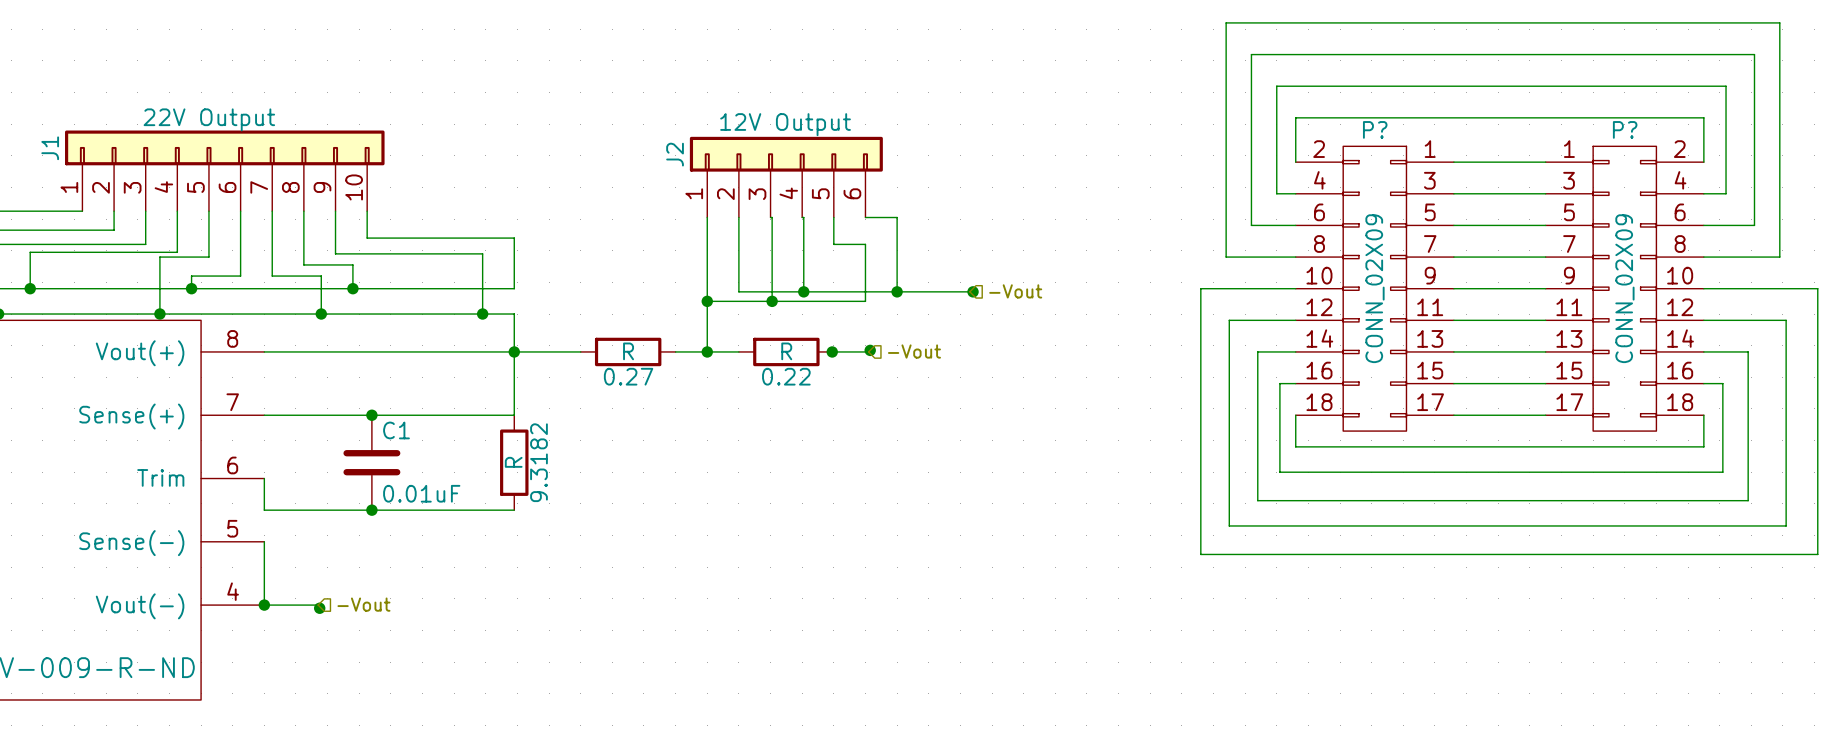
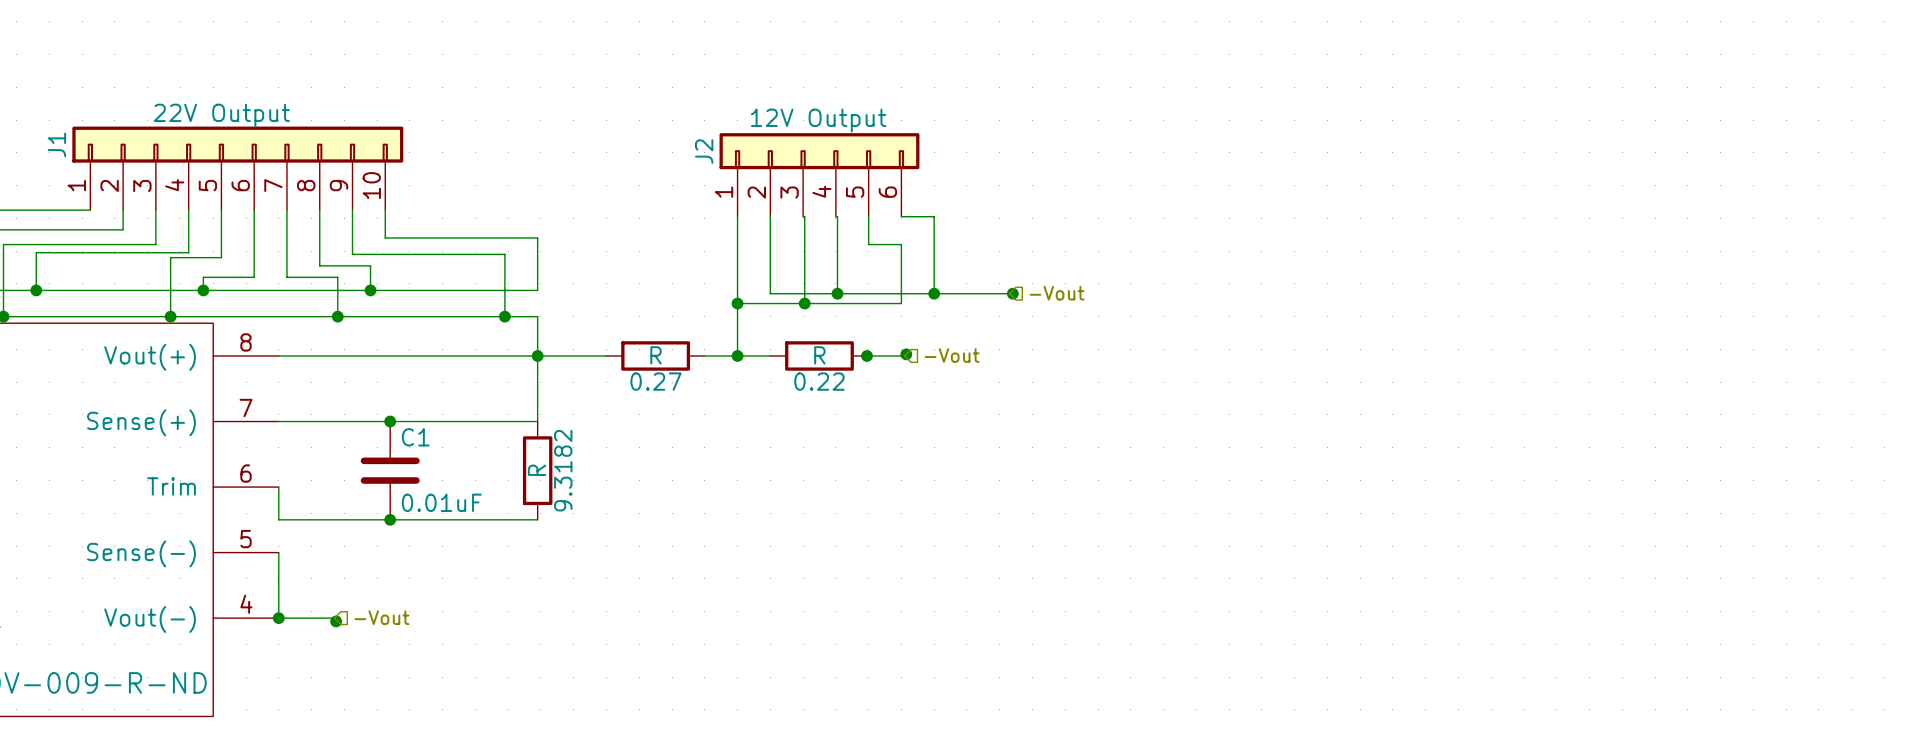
wire: (1295, 162) (1295, 117) (1703, 117) (1703, 162) -> none
wire: (1453, 162) (1545, 162) -> none
wire: (1295, 193) (1276, 193) (1276, 86) (1726, 86) (1726, 193) (1703, 193) -> none
wire: (1453, 193) (1545, 193) -> none
wire: (1295, 225) (1251, 225) (1251, 54) (1754, 54) (1754, 225) (1703, 225) -> none
wire: (1453, 225) (1545, 225) -> none
wire: (1295, 257) (1226, 257) (1226, 22) (1779, 22) (1779, 257) (1703, 257) -> none
wire: (1453, 257) (1545, 257) -> none
wire: (1295, 288) (1200, 288) (1200, 554) (1817, 554) (1817, 288) (1703, 288) -> none
P?: CONN_02X09 (1374, 288) -> none
wire: (1453, 288) (1545, 288) -> none
P?: CONN_02X09 (1624, 288) -> none
wire: (1295, 320) (1229, 320) (1229, 525) (1786, 525) (1786, 320) (1703, 320) -> none
wire: (1453, 320) (1545, 320) -> none
wire: (1295, 351) (1257, 351) (1257, 500) (1748, 500) (1748, 351) (1703, 351) -> none
wire: (1453, 351) (1545, 351) -> none
wire: (1295, 383) (1279, 383) (1279, 472) (1722, 472) (1722, 383) (1703, 383) -> none
wire: (1453, 383) (1545, 383) -> none
wire: (1295, 415) (1295, 446) (1703, 446) (1703, 415) -> none
wire: (1453, 415) (1545, 415) -> none

